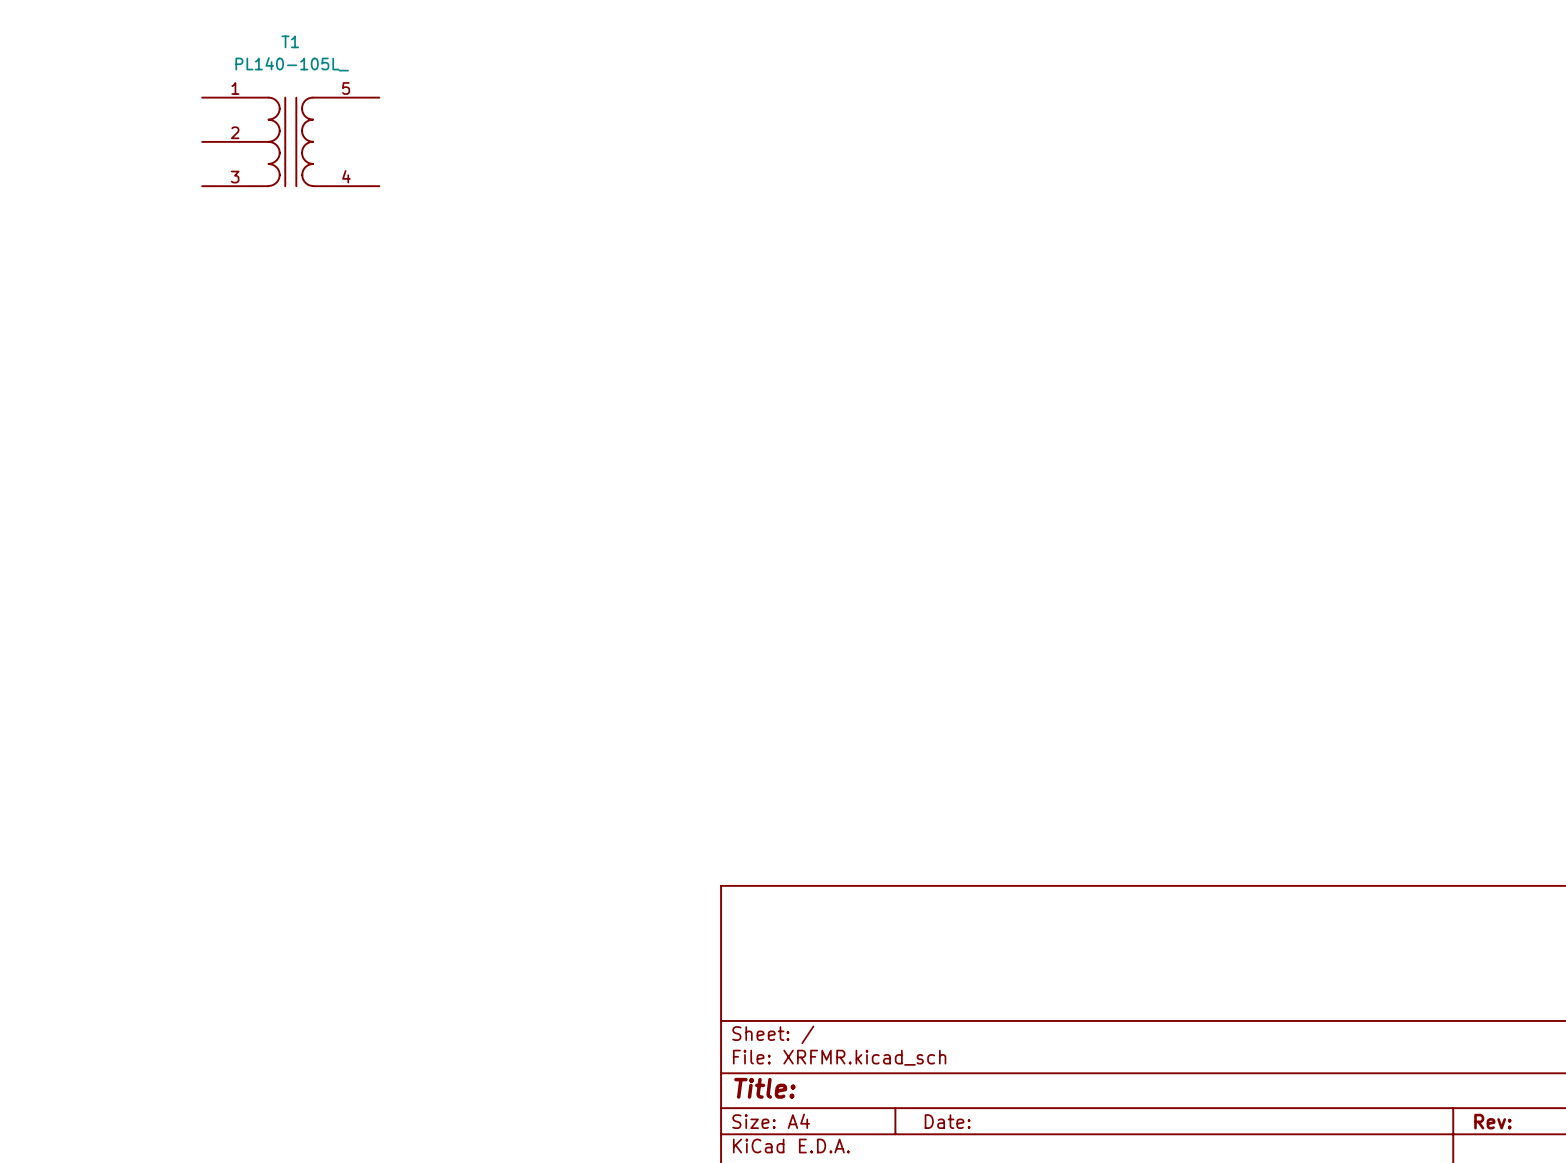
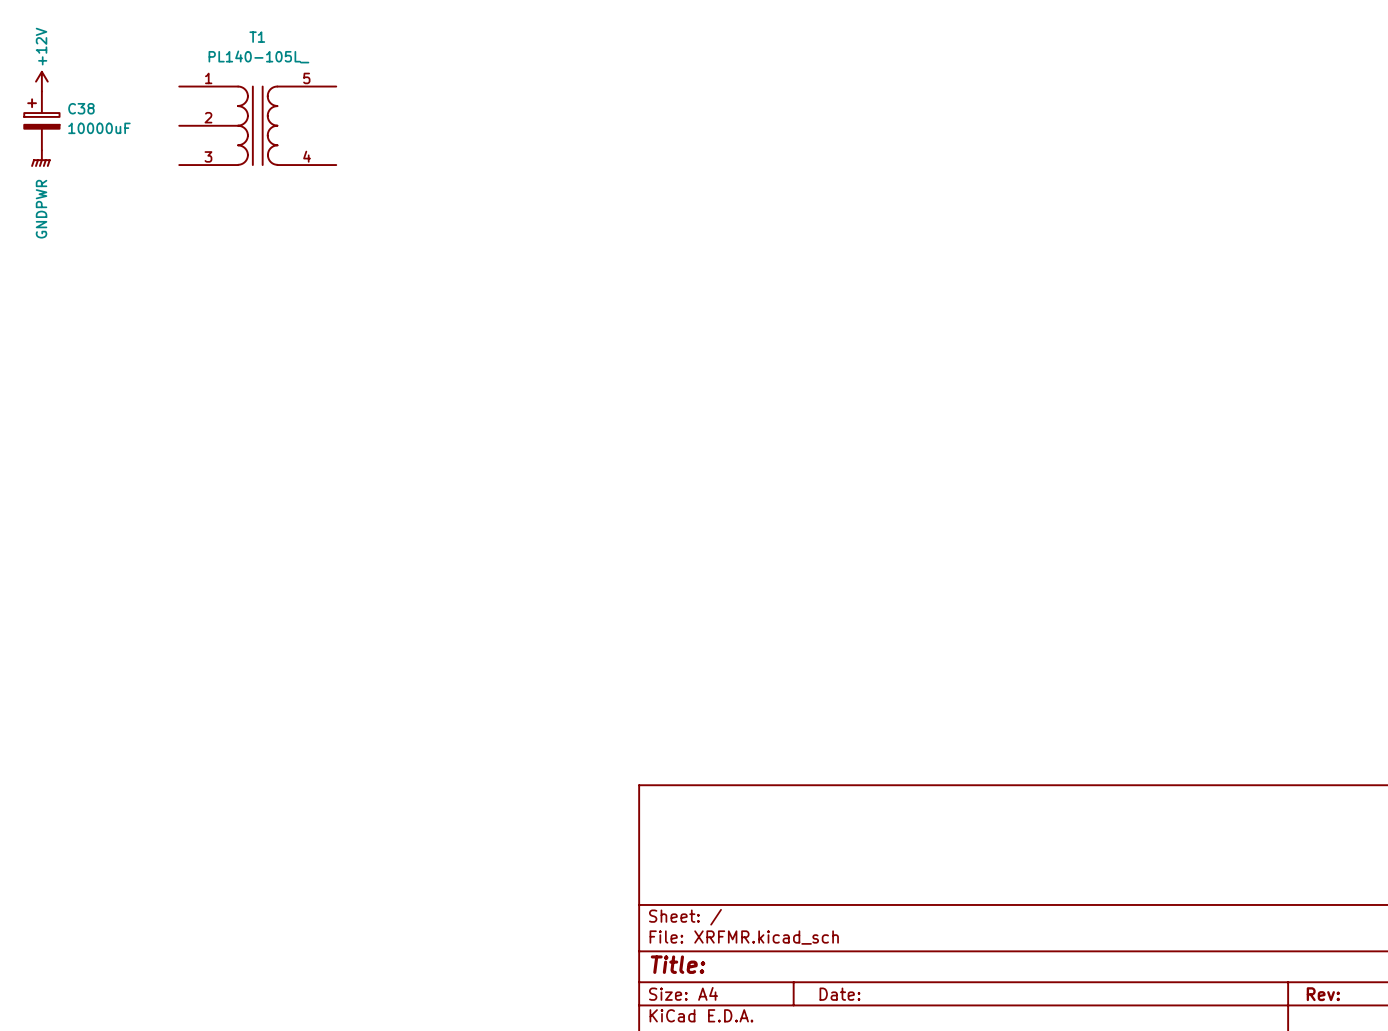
power symbol: none -> +12V (41, 81)
C38: none -> 10000uF (41, 120)
power symbol: none -> GNDPWR (40, 158)

